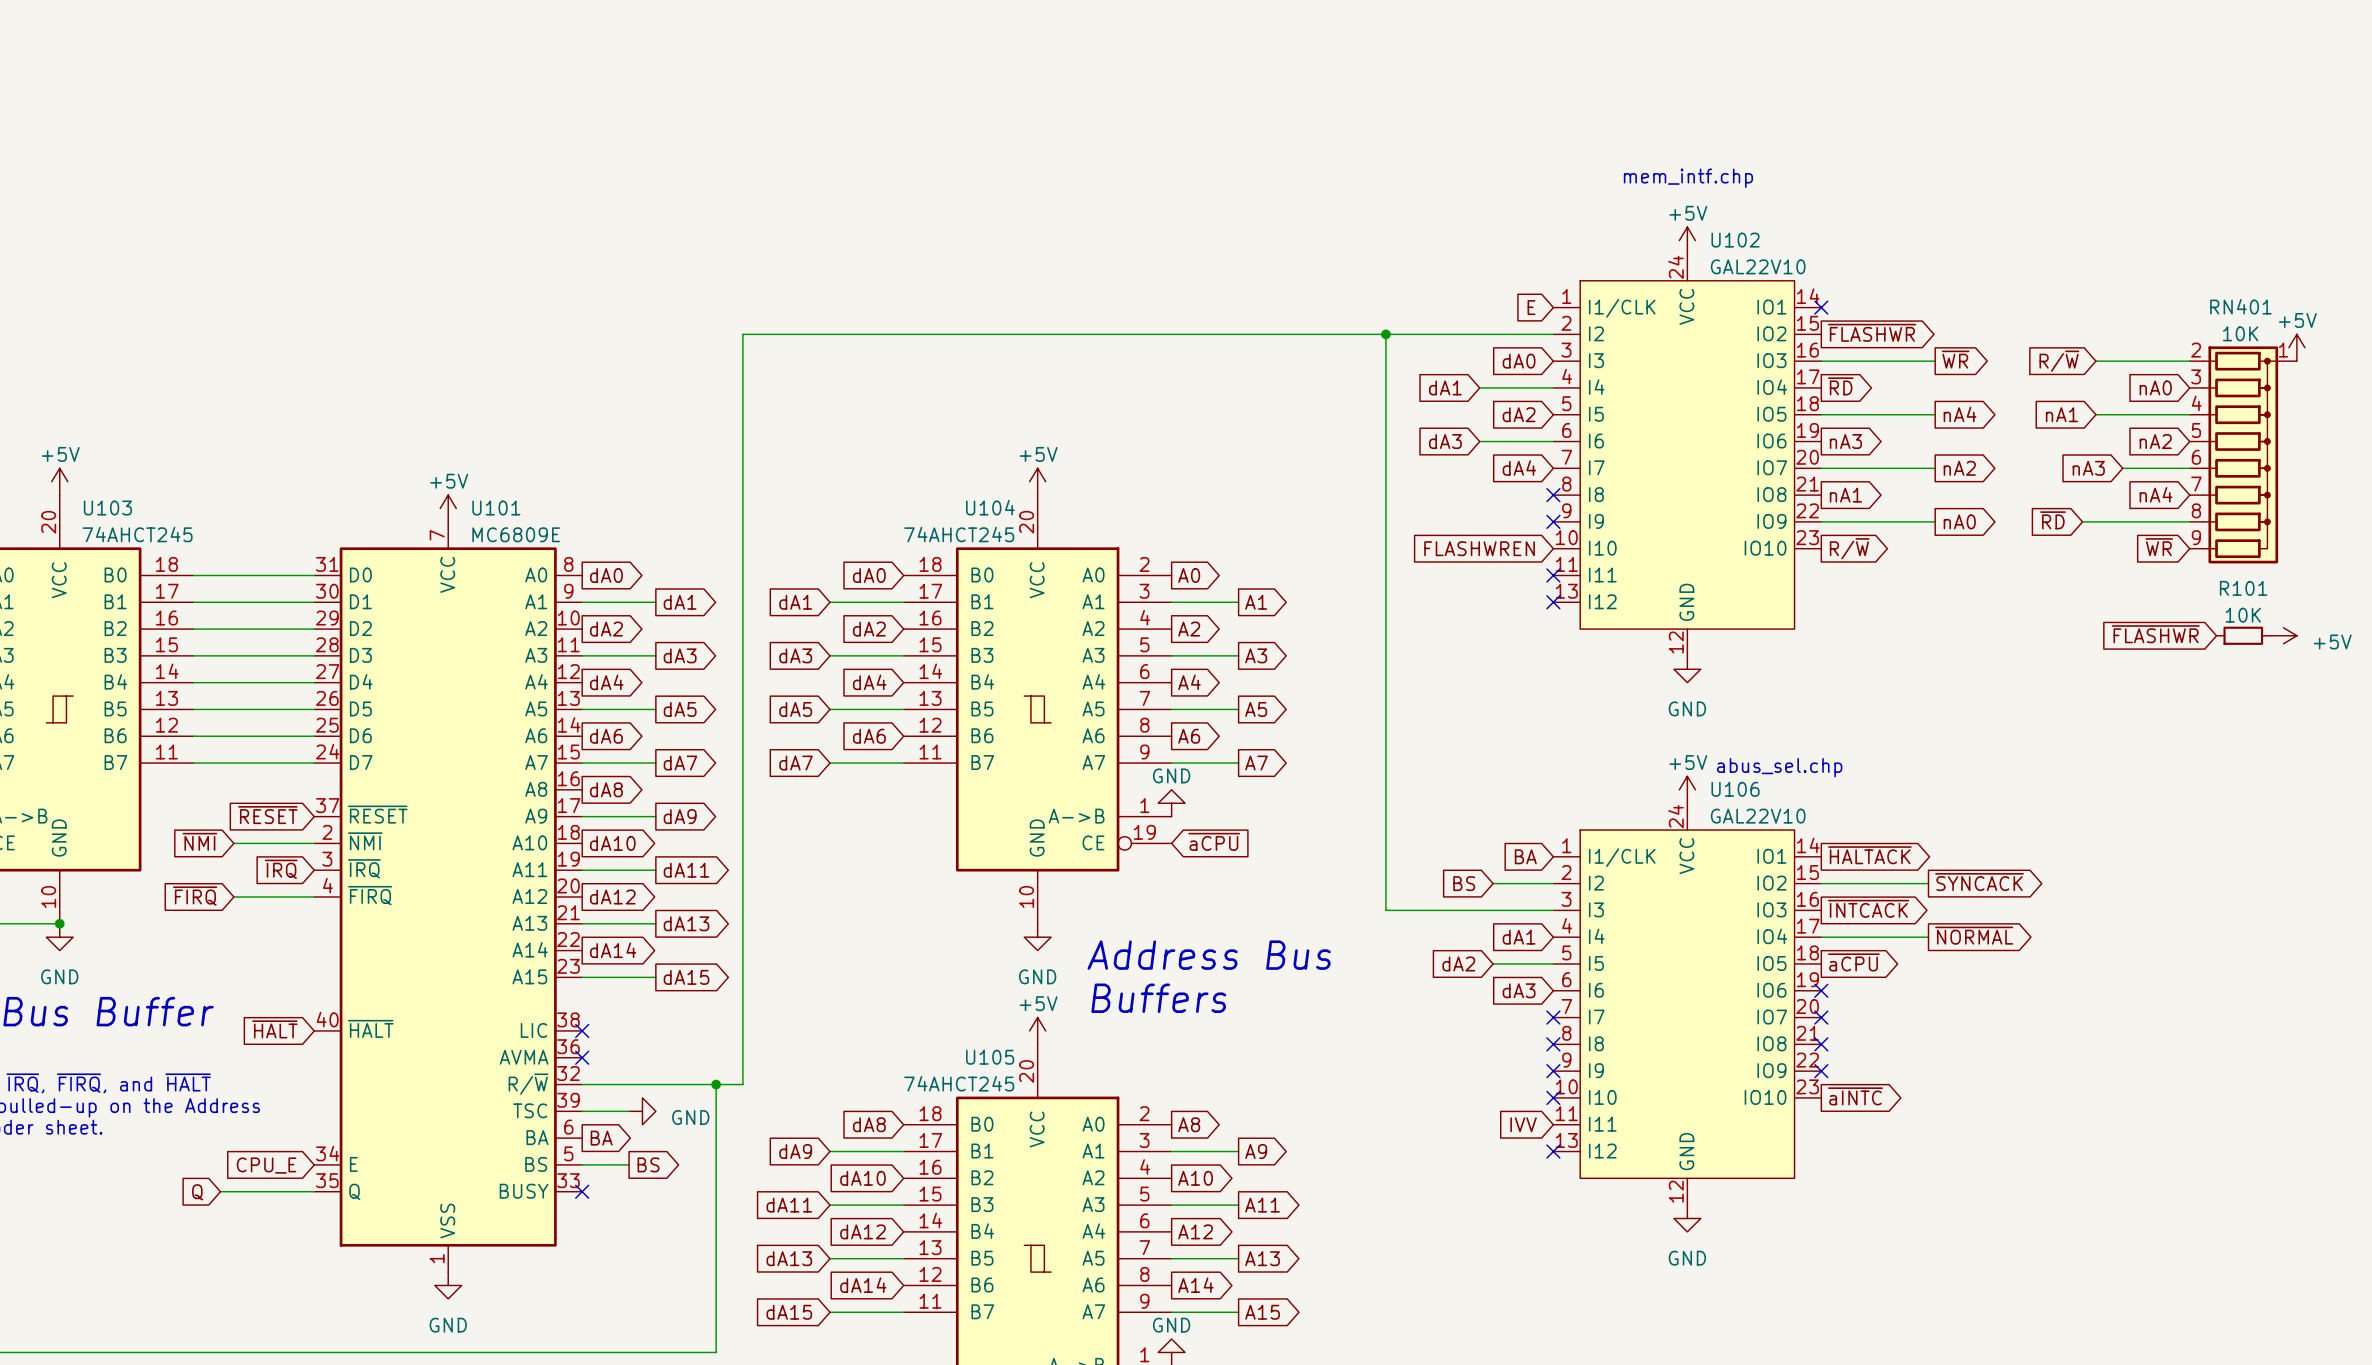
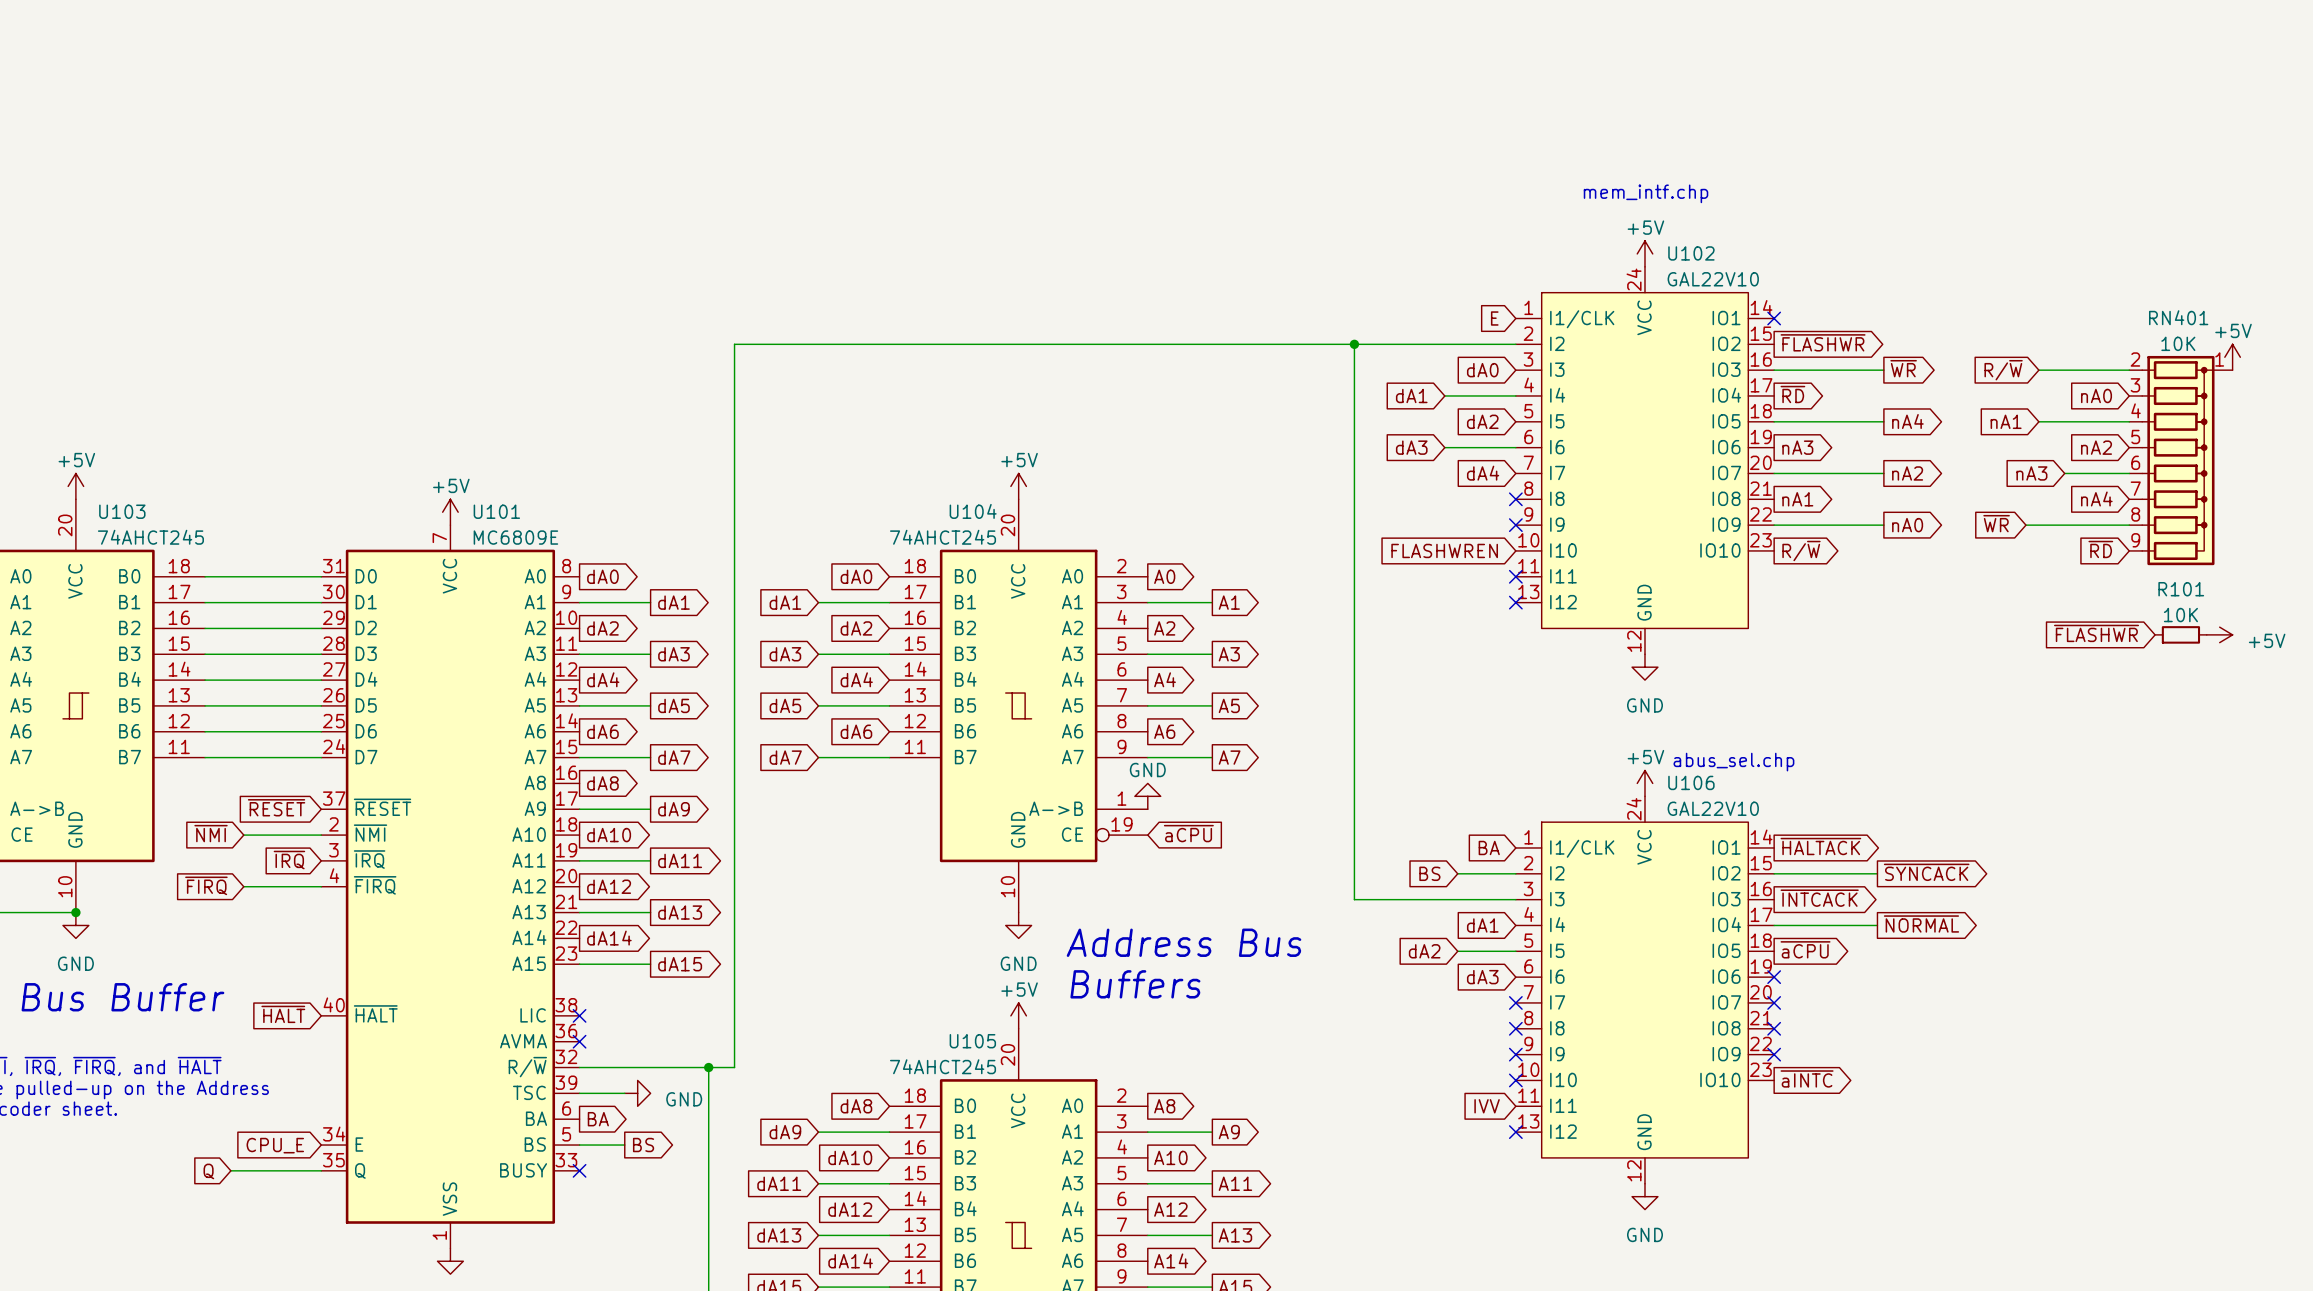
global label: ~{RD} (2053, 520) -> ~{WR} (1996, 523)
global label: ~{WR} (2159, 547) -> ~{RD} (2100, 549)

